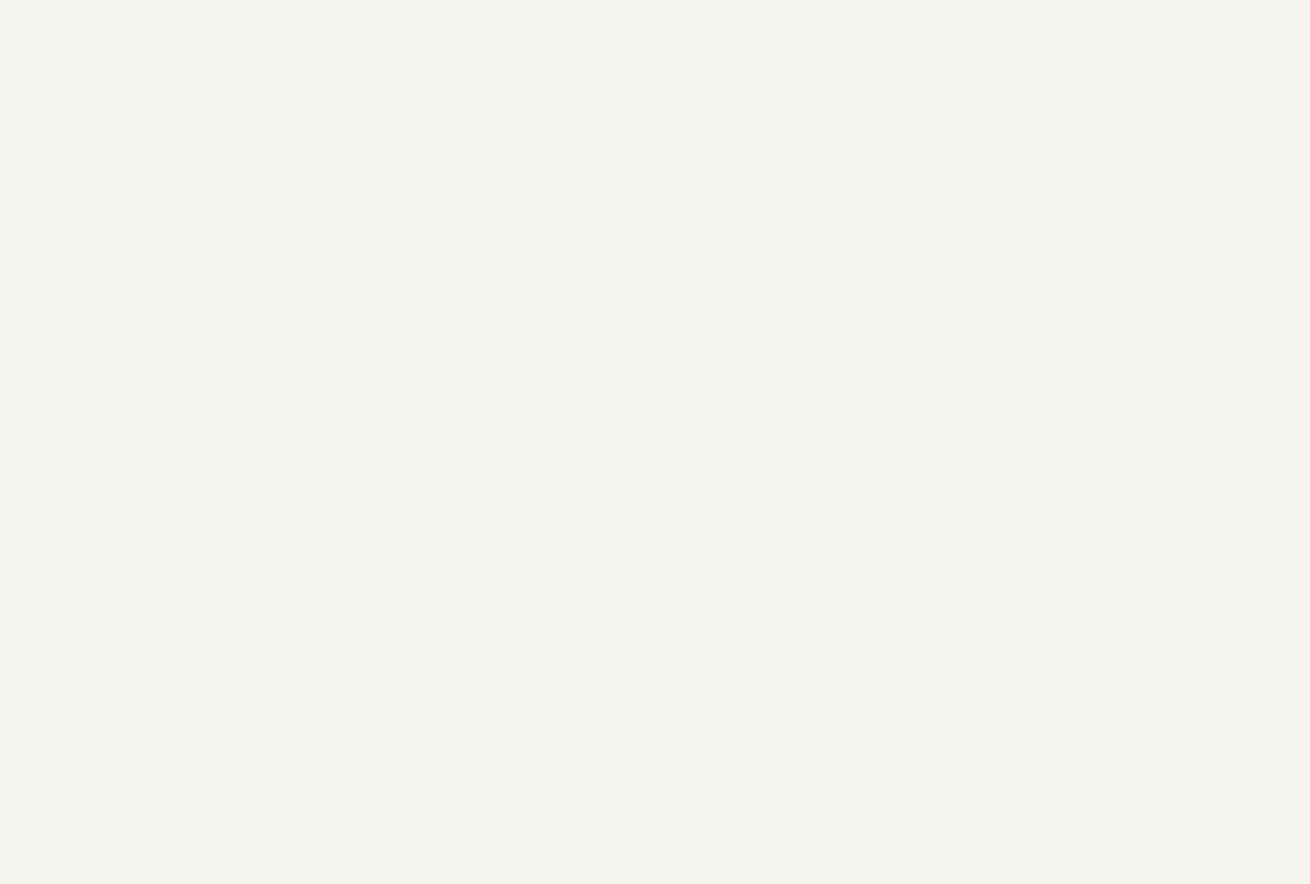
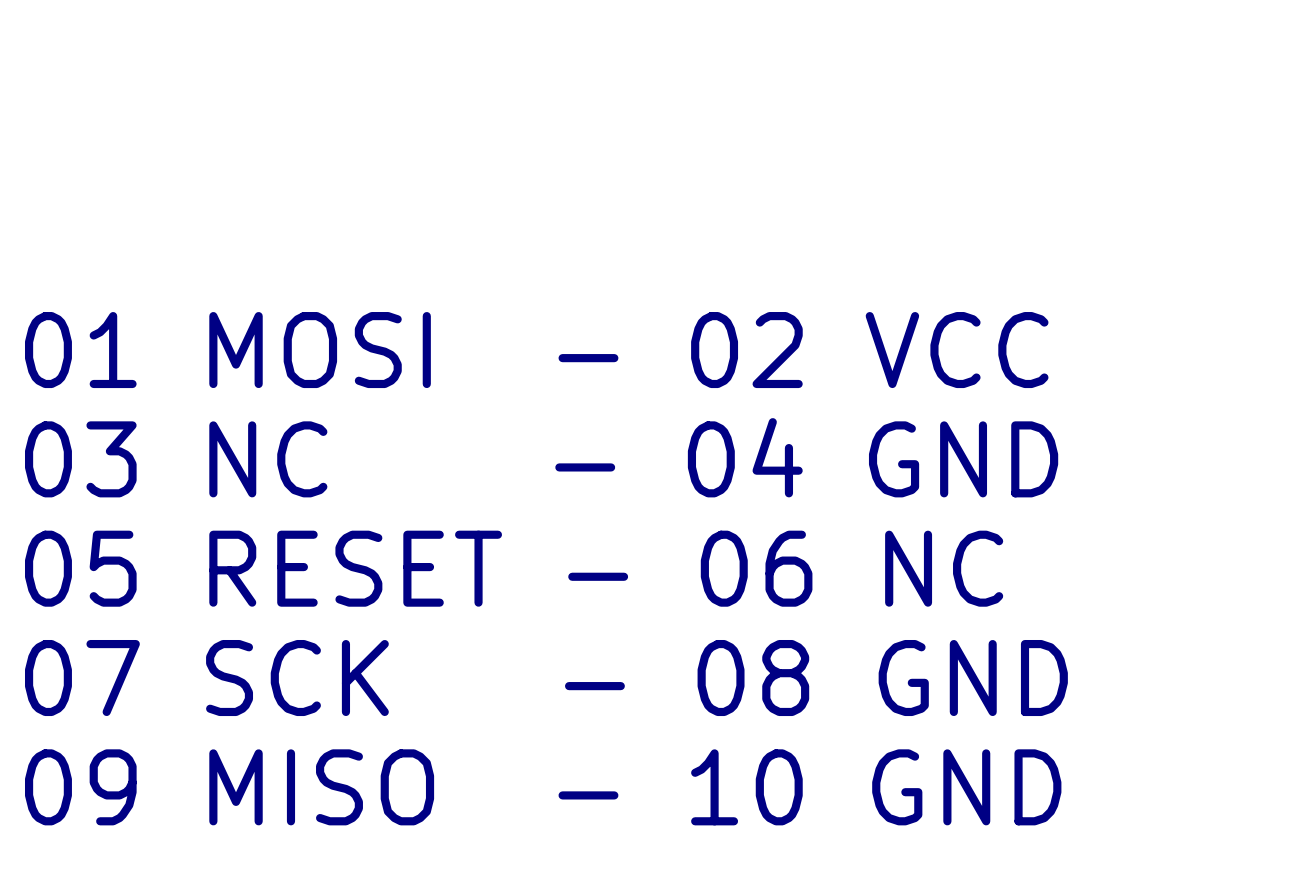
text: none -> 01 MOSI - 02 VCC (536, 350)
text: none -> 03 NC - 04 GND (541, 457)
text: none -> 05 RESET - 06 NC (514, 568)
text: none -> 07 SCK - 08 GND (546, 678)
text: none -> 09 MISO - 10 GND (543, 787)

